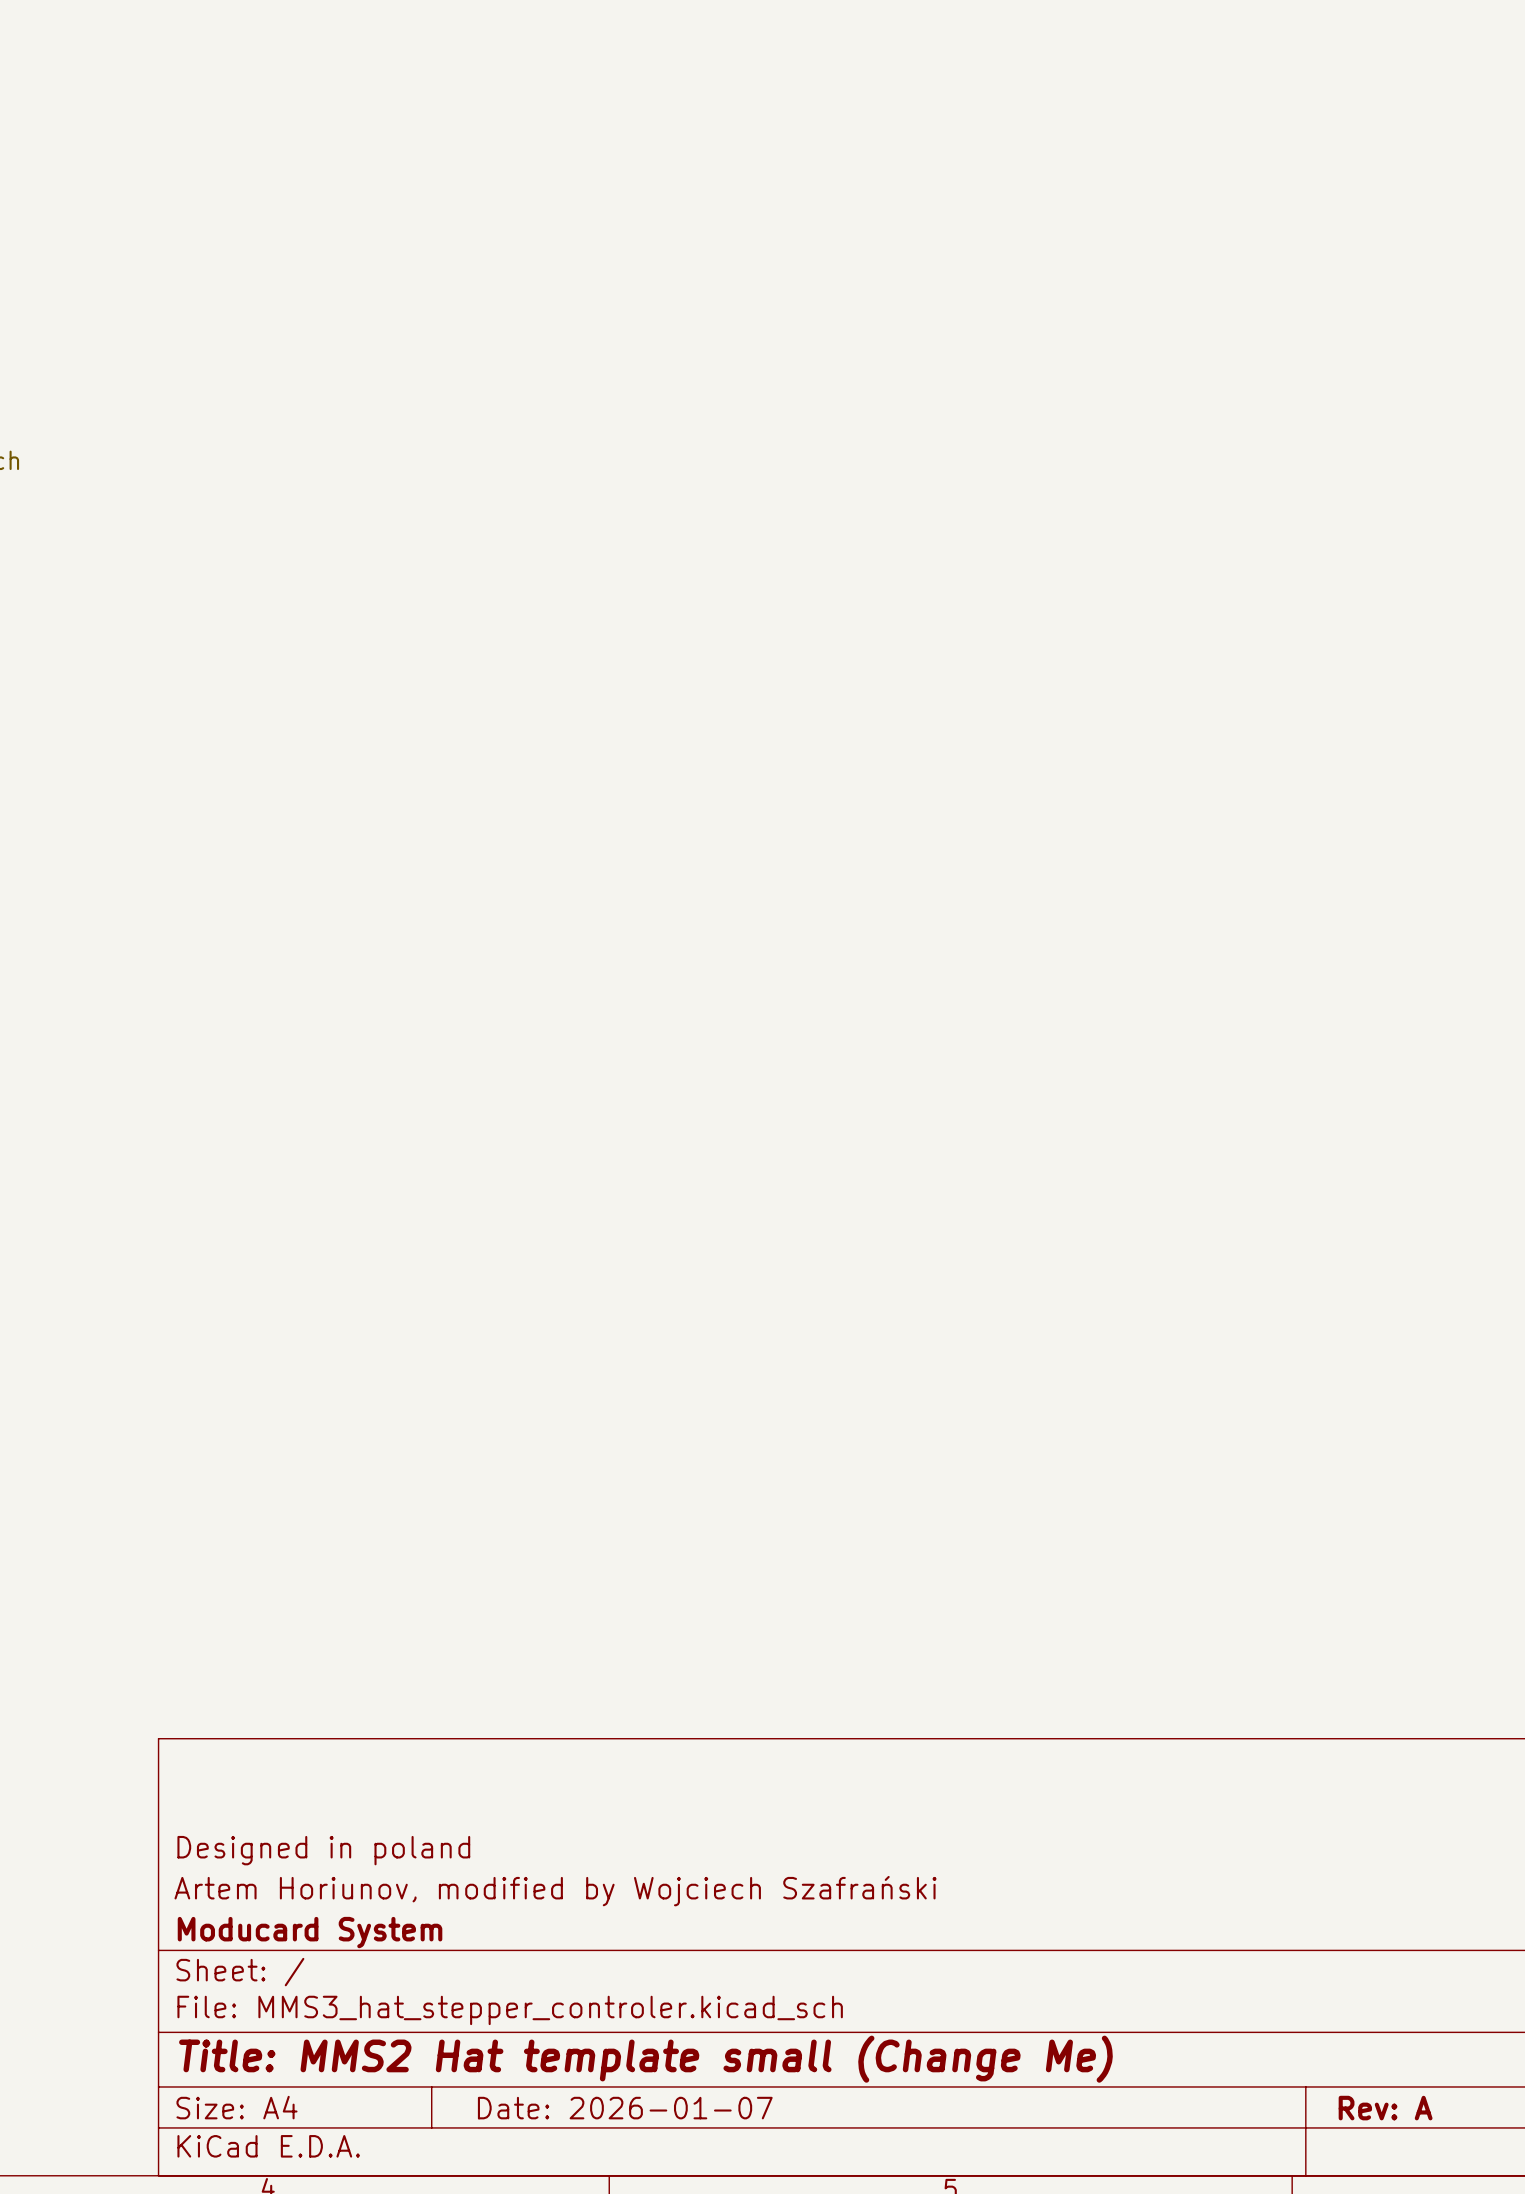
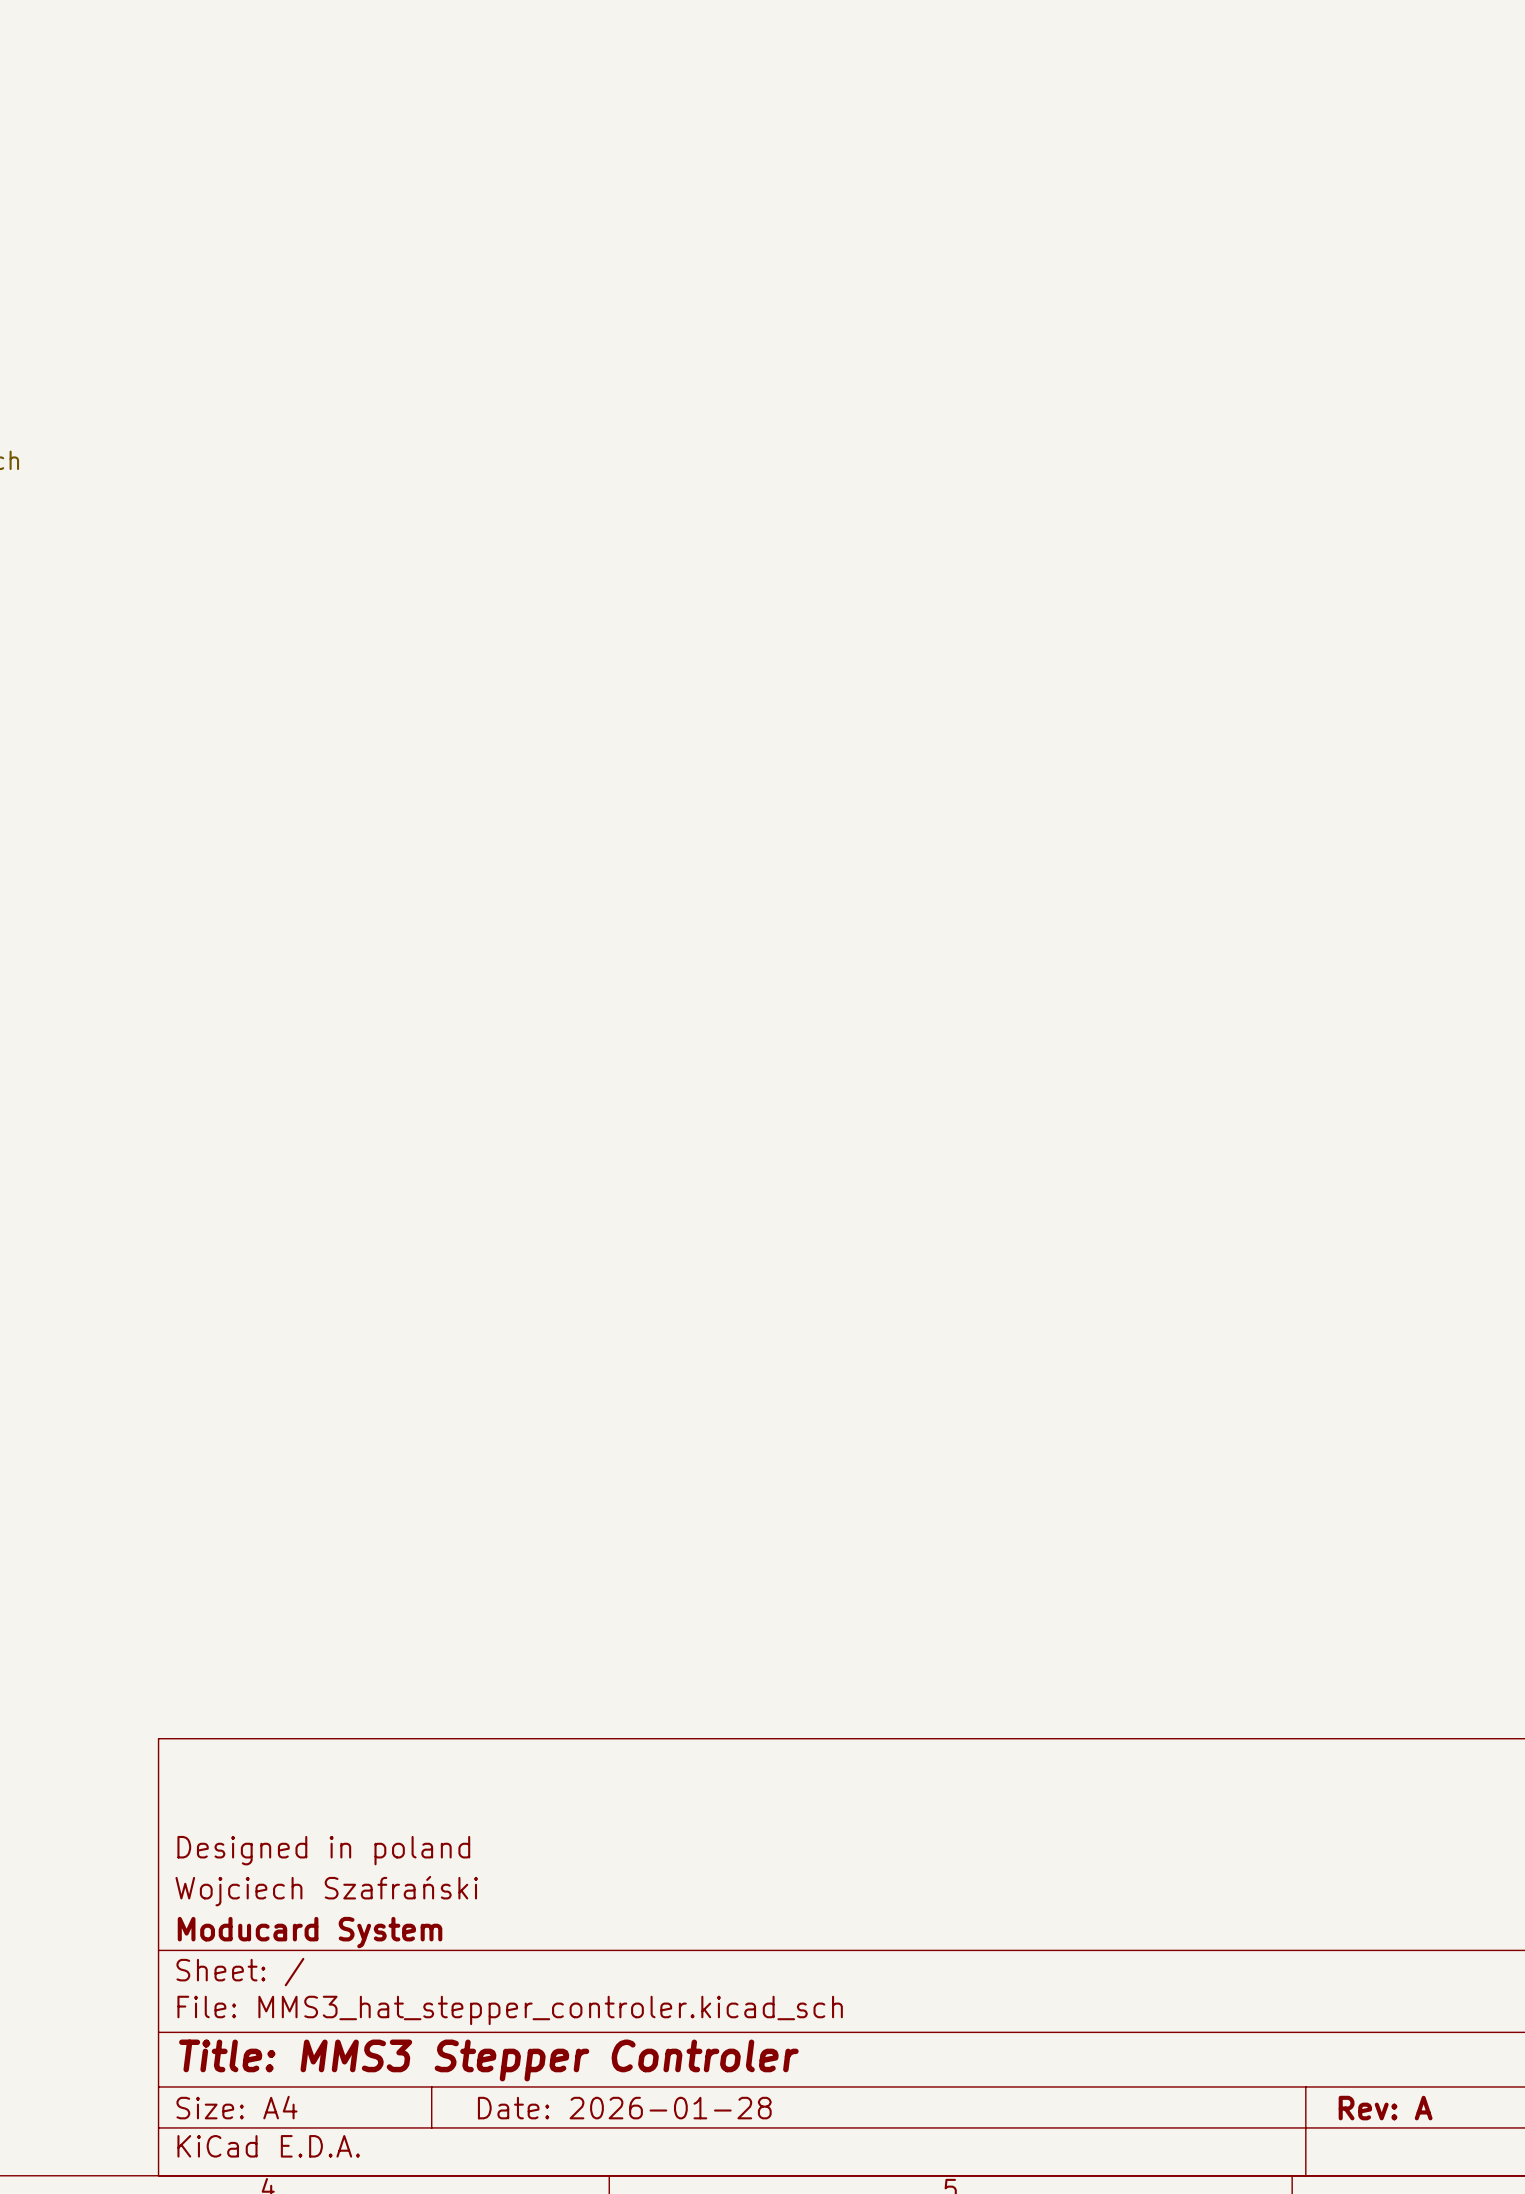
title block: Artem Horiunov, modified by Wojciech Szafrański (555, 1891) -> Wojciech Szafrański (326, 1891)
title block: Title: MMS2 Hat template small (Change Me) (645, 2059) -> Title: MMS3 Stepper Controler (488, 2060)
title block: Date: 2026-01-07 (625, 2108) -> Date: 2026-01-28 (624, 2108)

